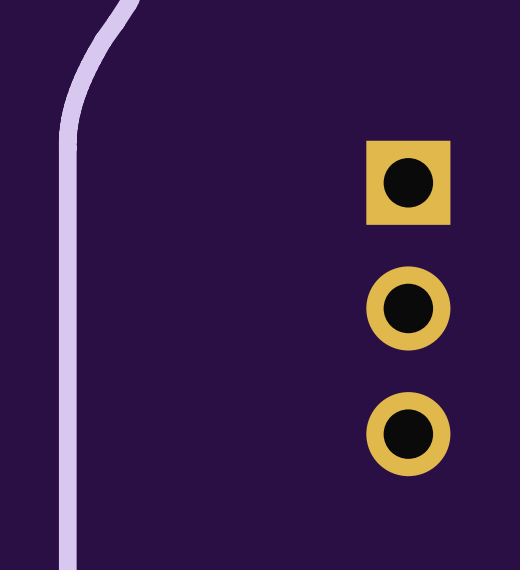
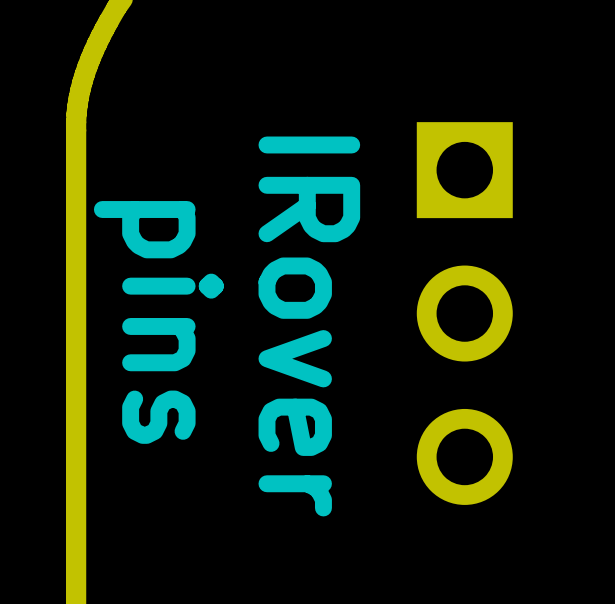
text: none -> pins (158, 322)
text: none -> IRover (309, 326)

